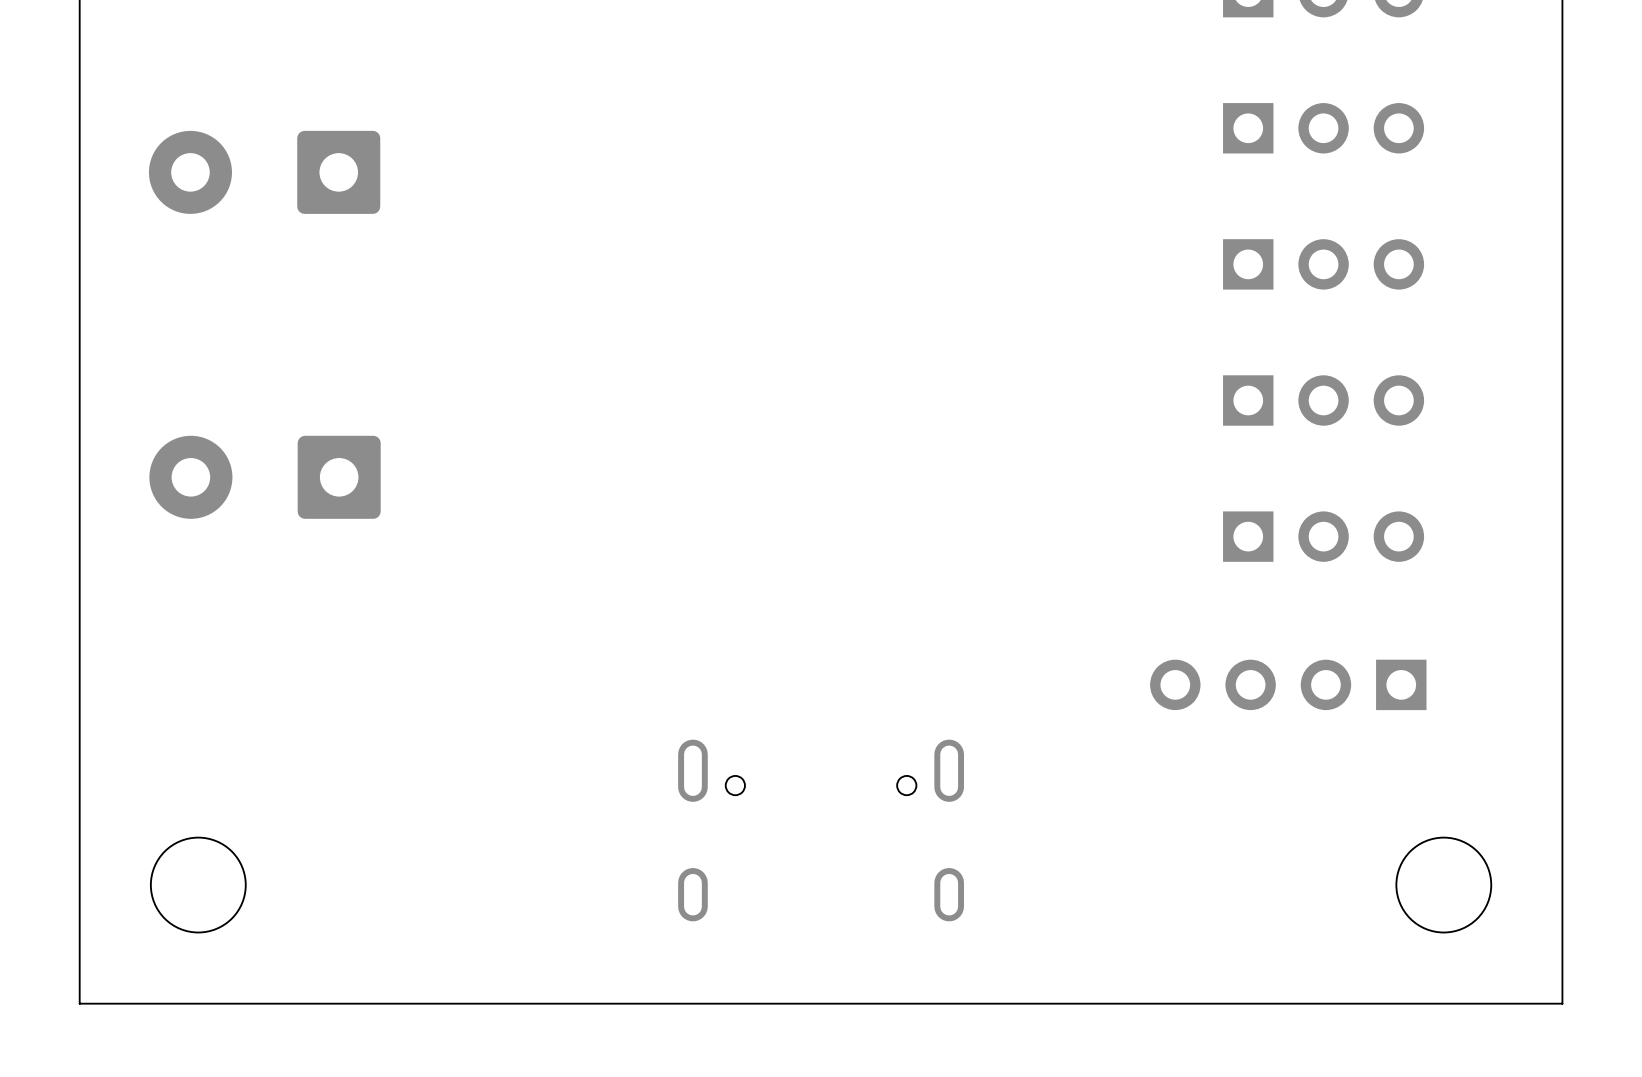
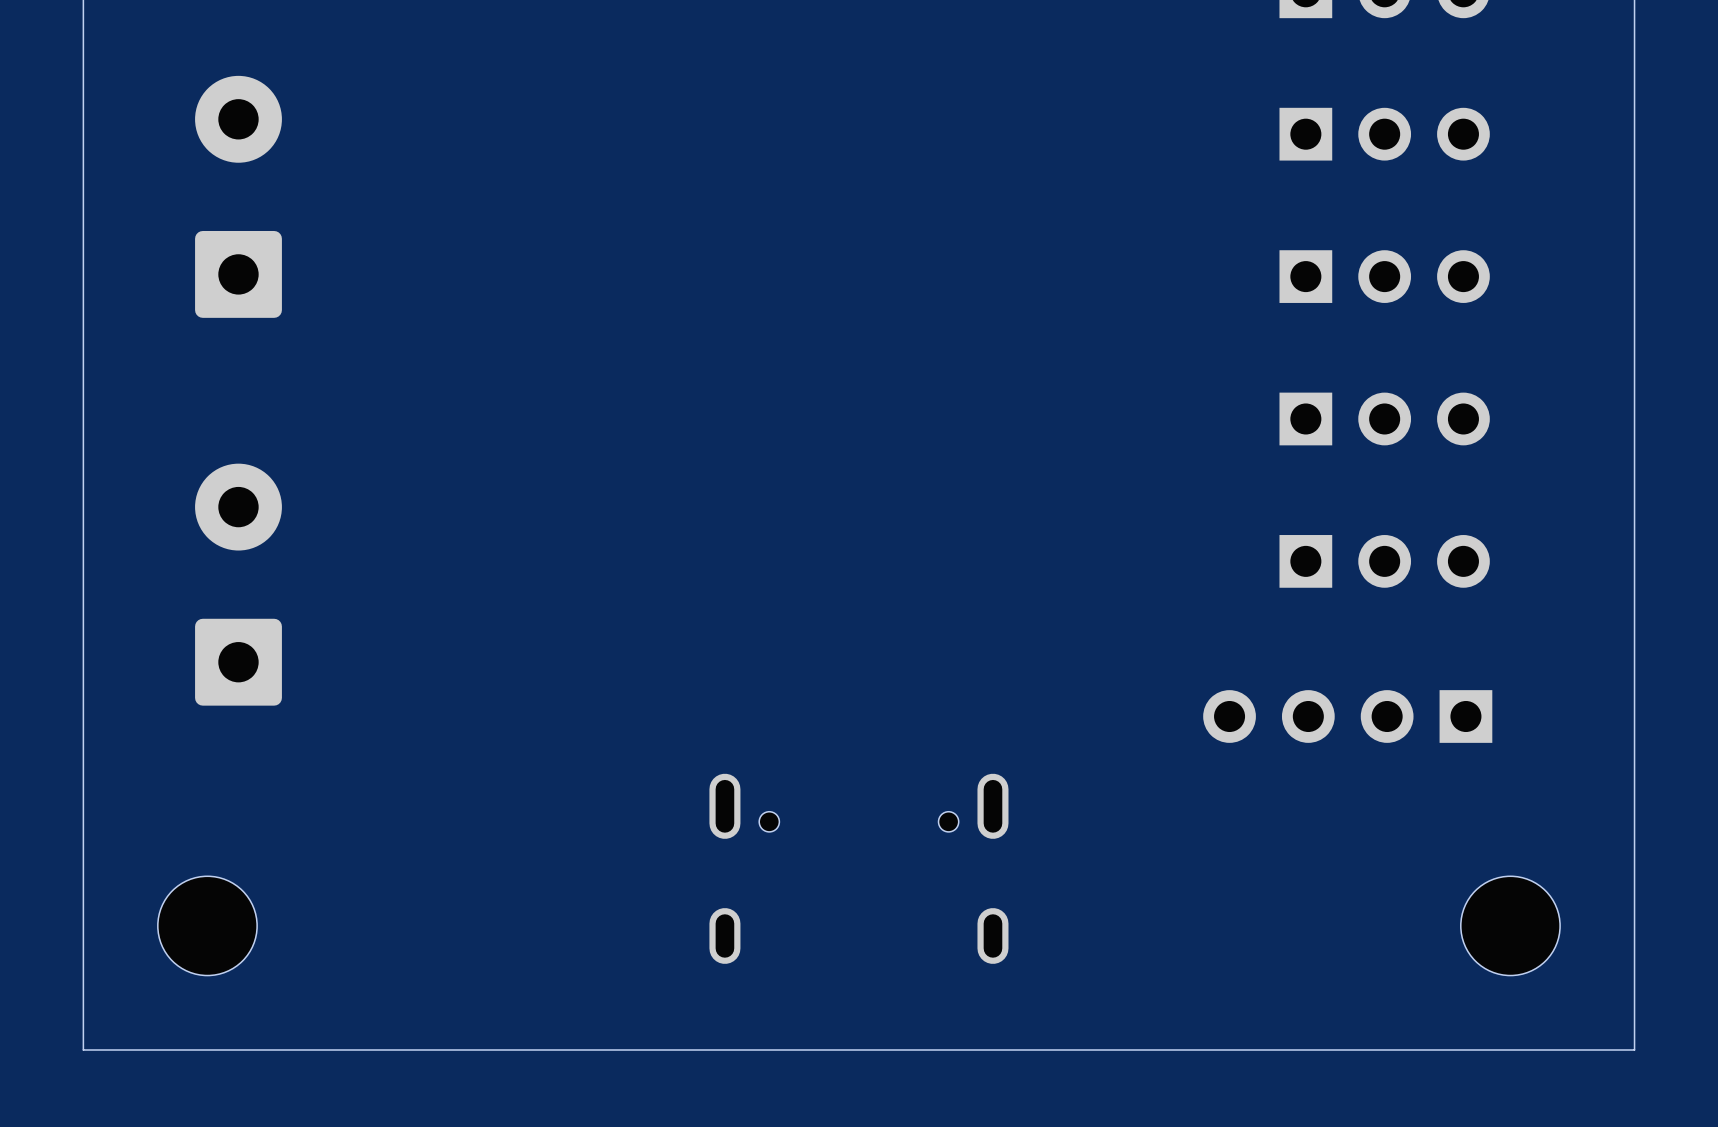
part rotation: 0° (264, 172) -> 90° clockwise (238, 196)
part rotation: 0° (265, 477) -> 90° clockwise (238, 584)

